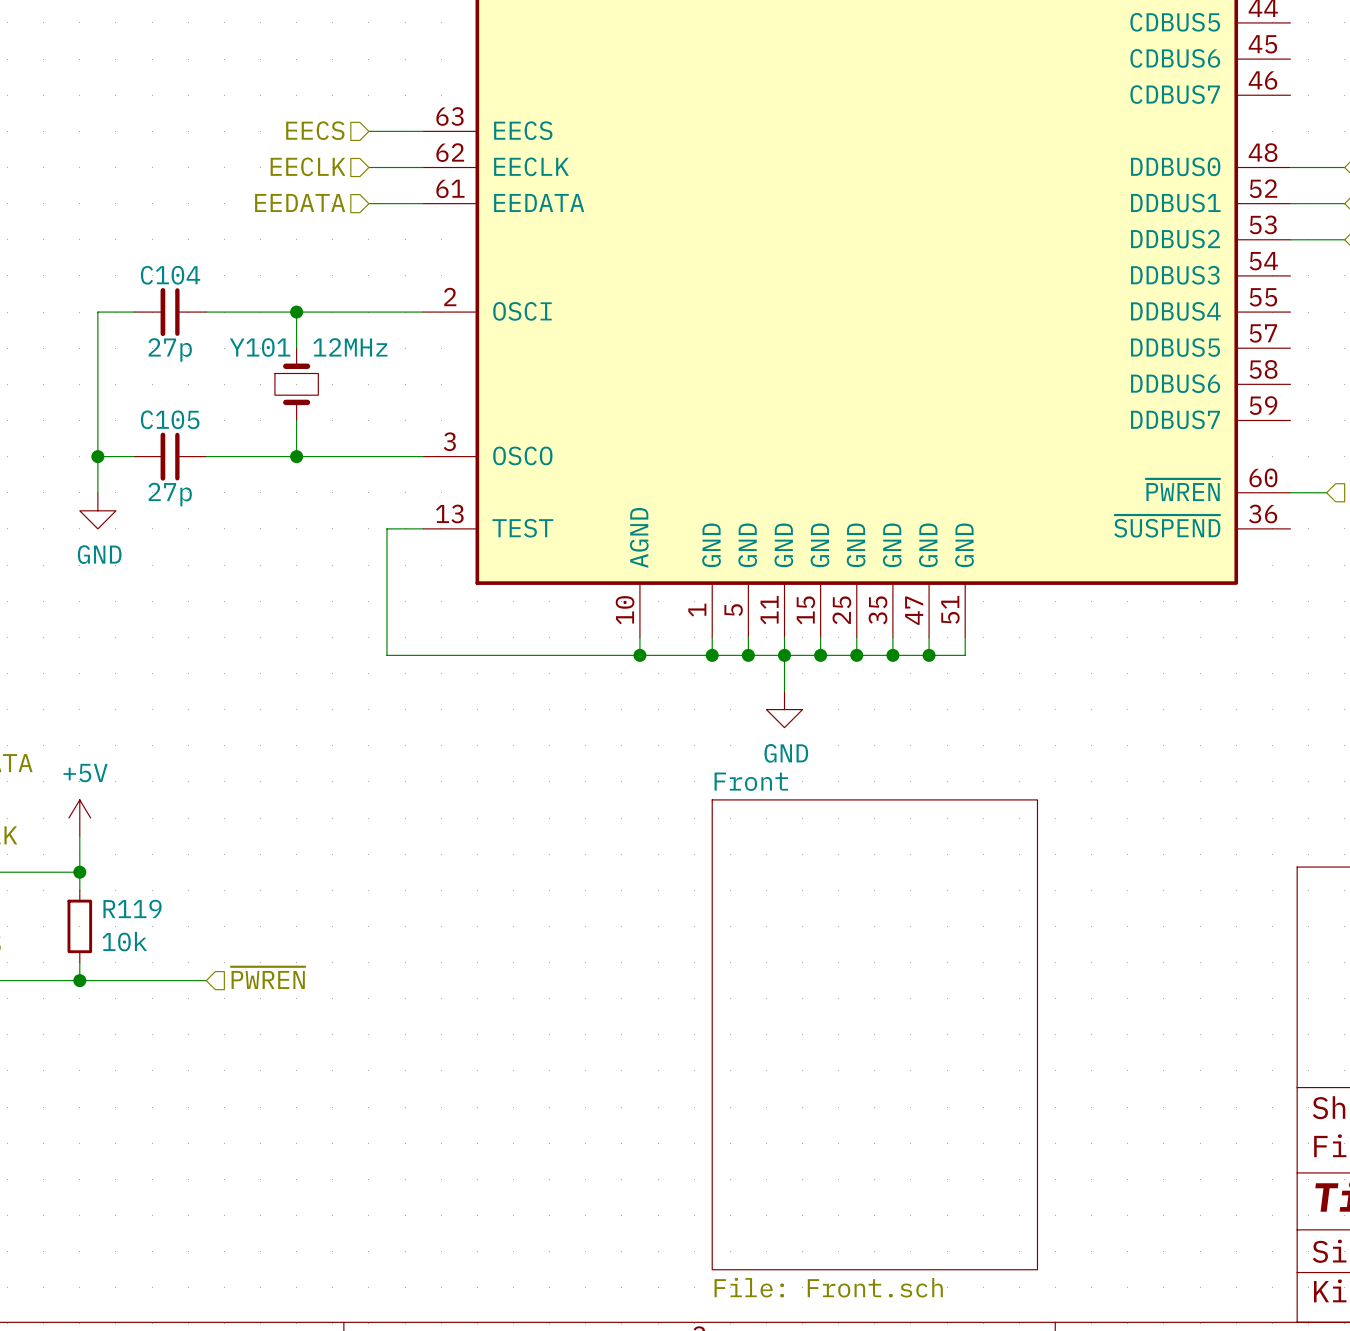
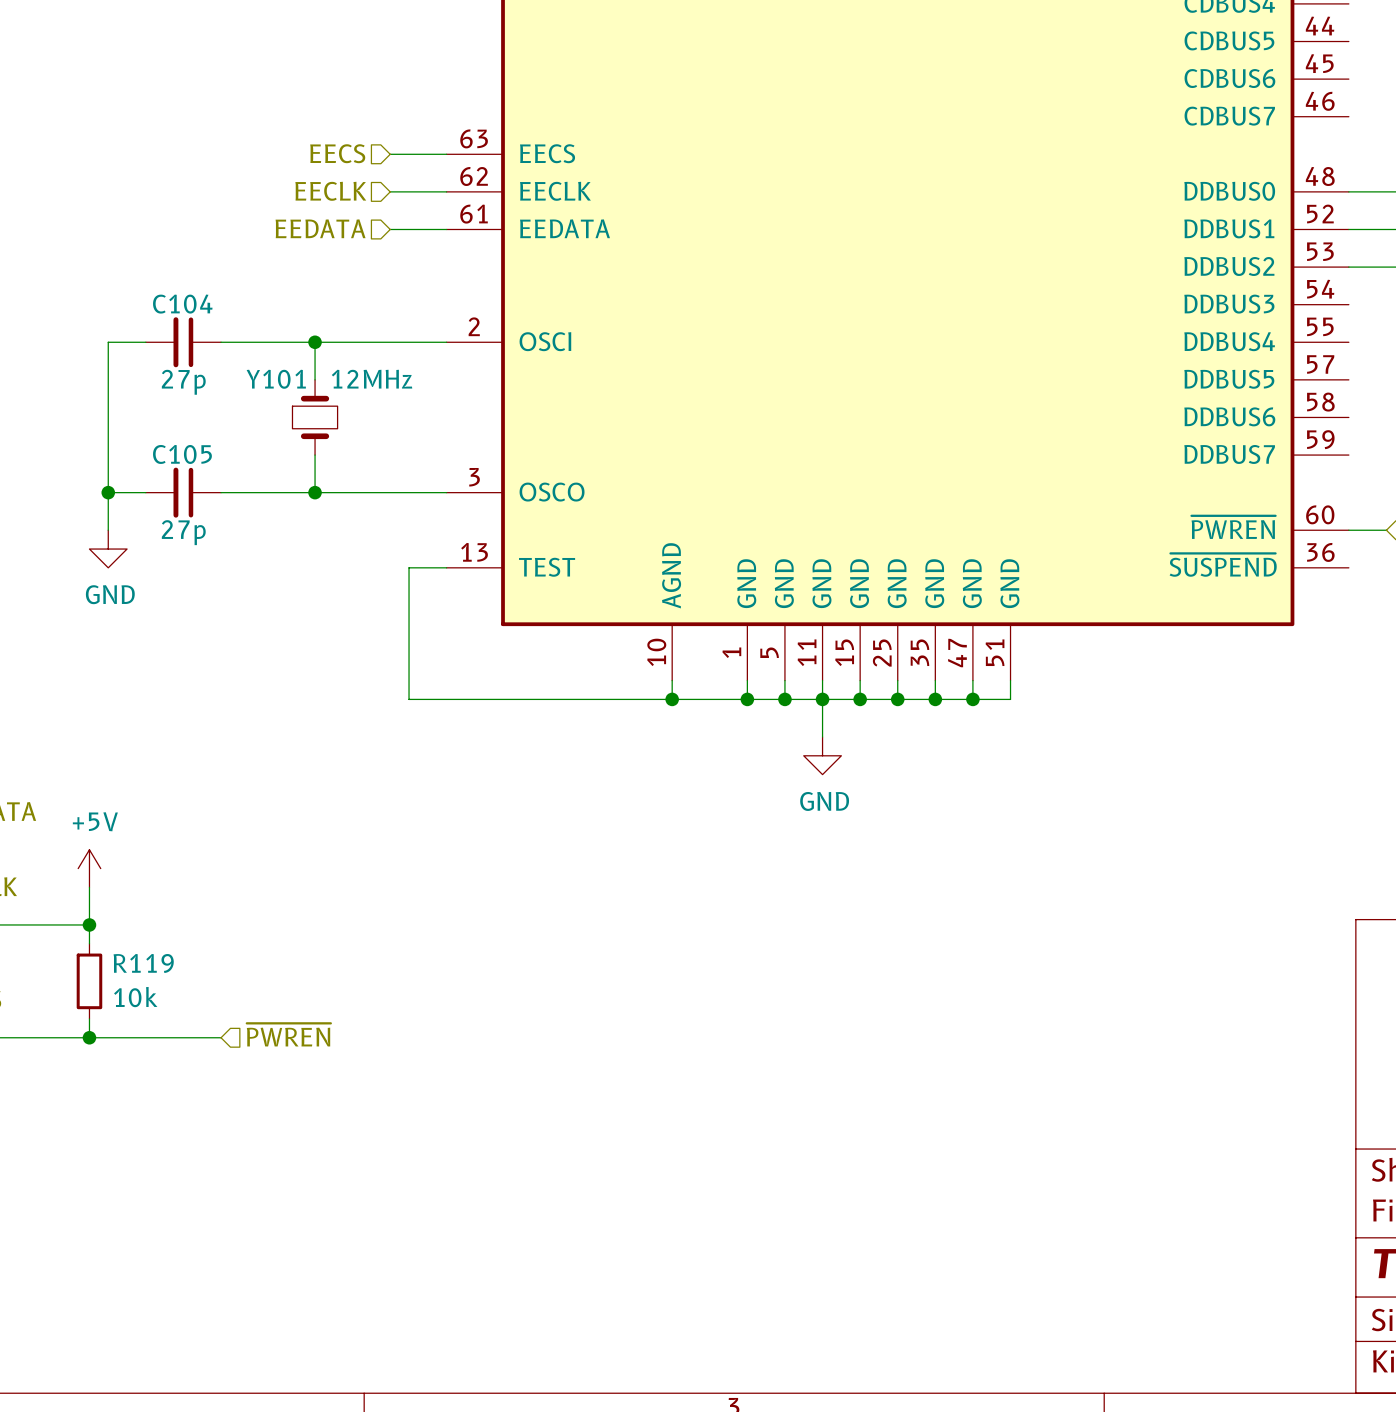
sheet Front: File: Front.sch (874, 1034) -> none

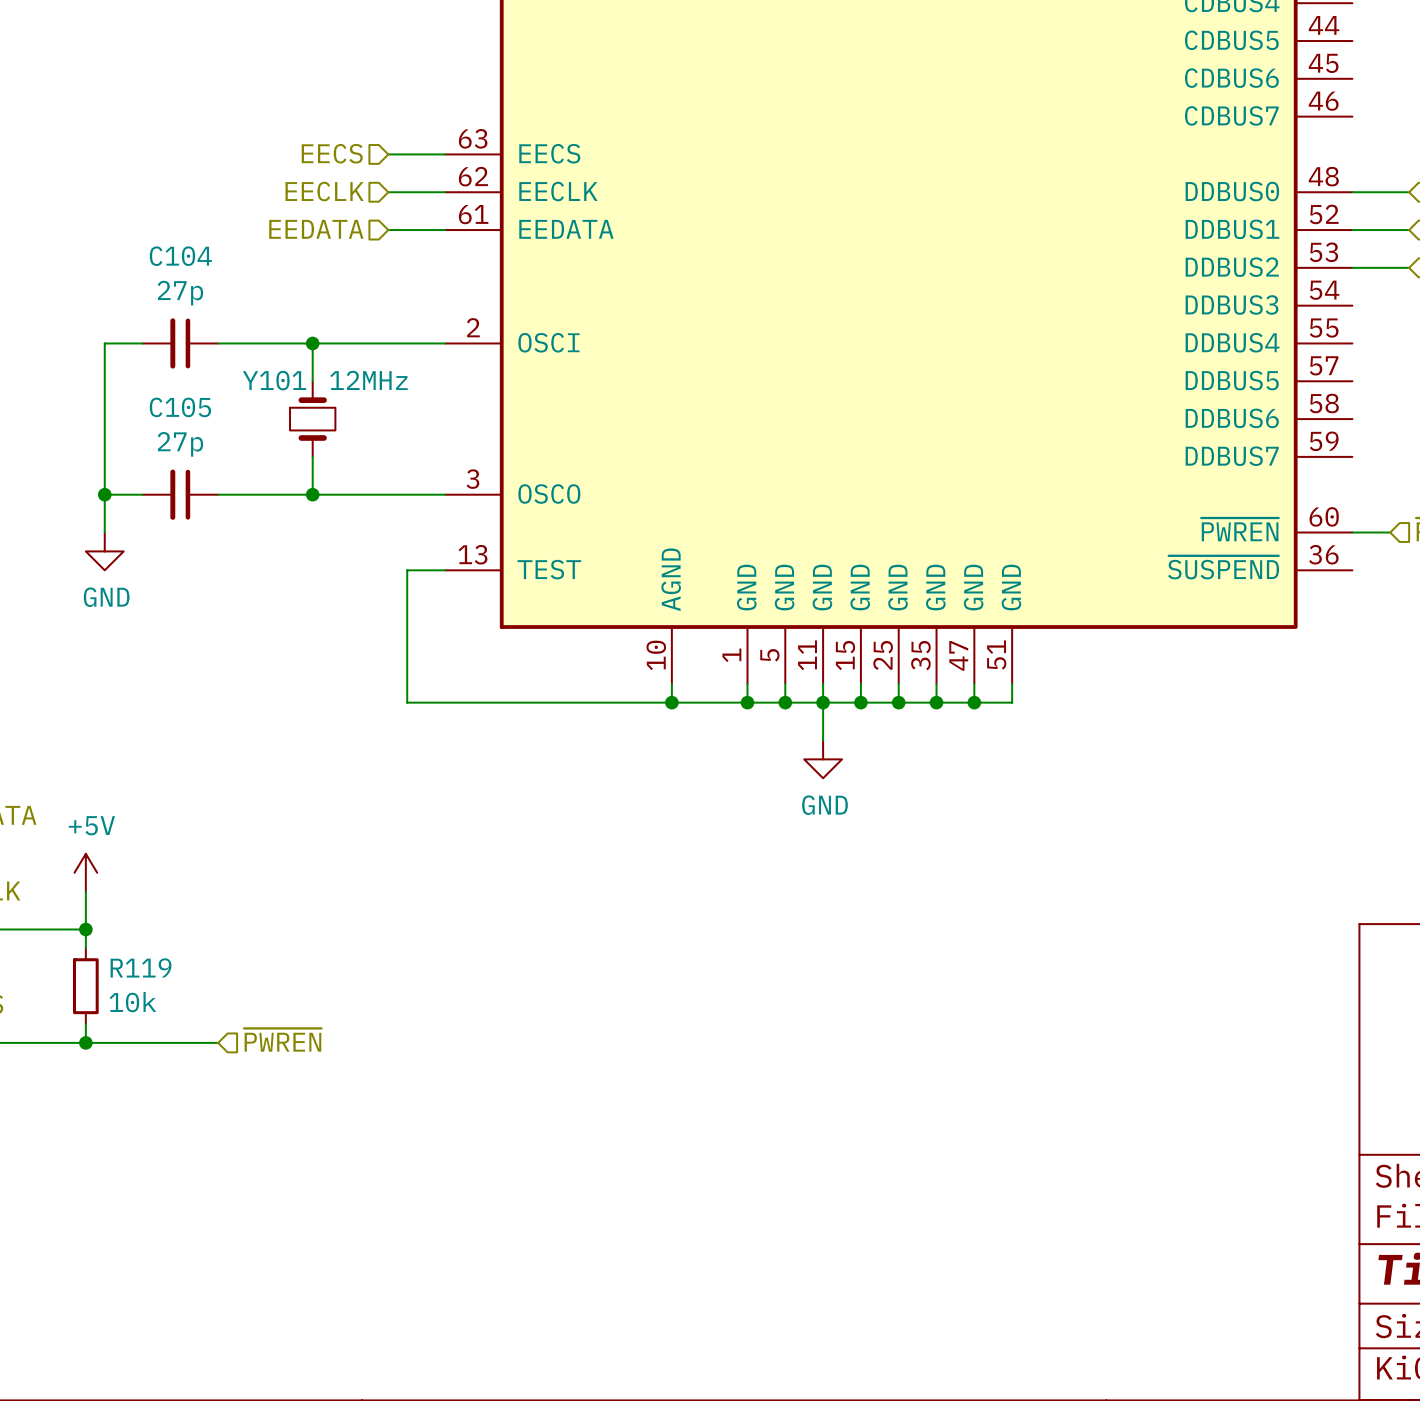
C104 name position: C104 (182, 304) -> C104 (180, 256)
C104 value position: 27p (183, 382) -> 27p (180, 293)
C105 name position: C105 (182, 454) -> C105 (180, 407)
C105 value position: 27p (183, 532) -> 27p (180, 444)

